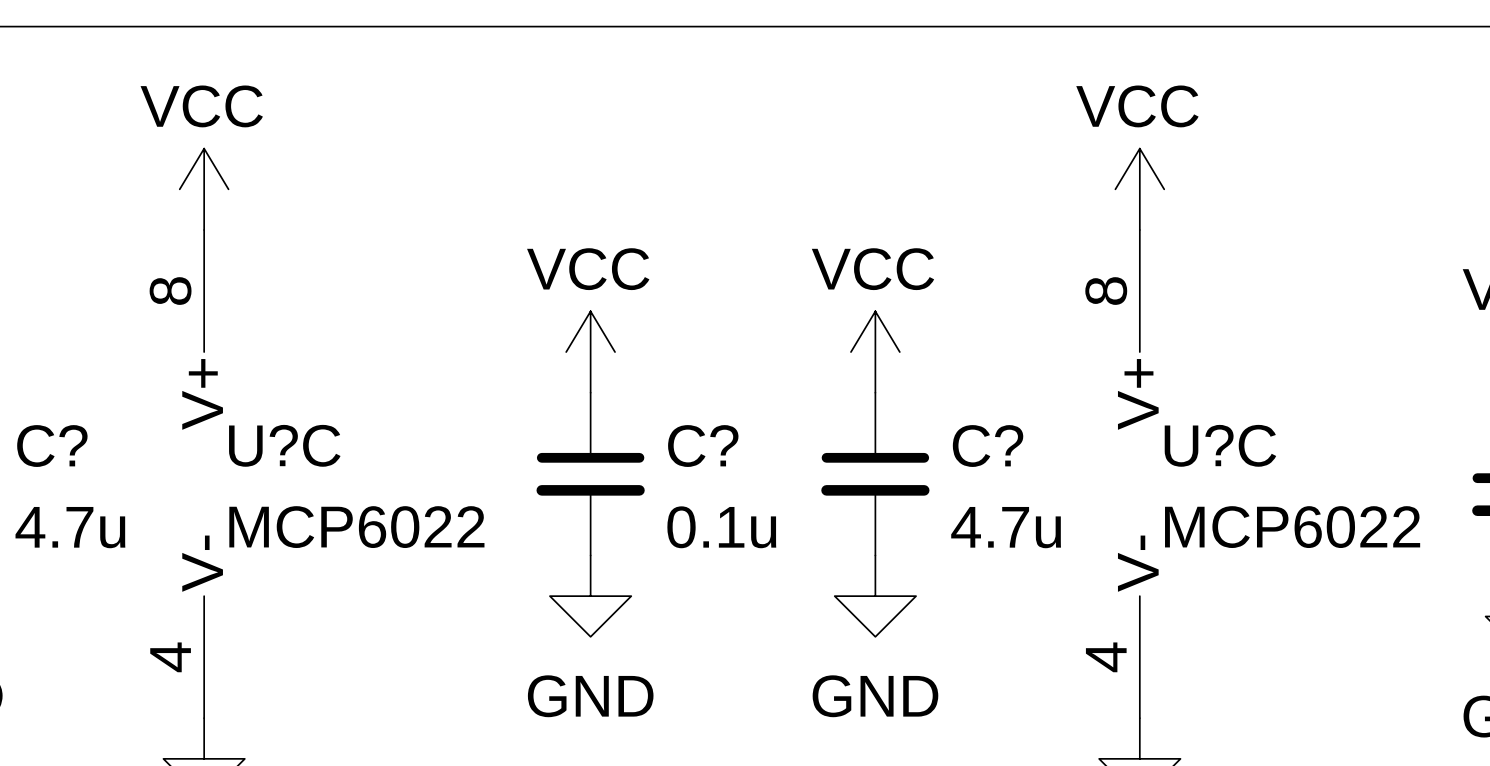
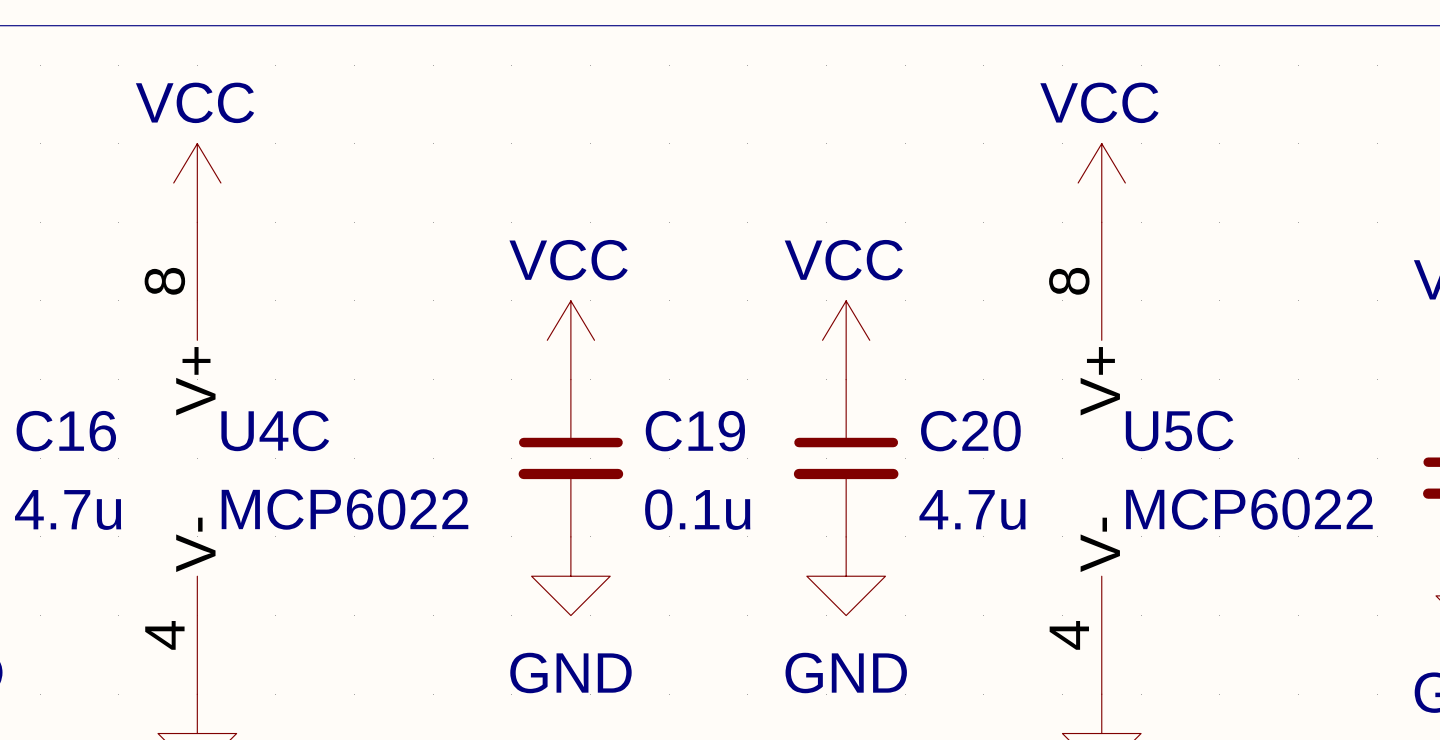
U?C name: U?C (284, 445) -> U4C (275, 430)
U?C name: U?C (1220, 445) -> U5C (1179, 430)
C? name: C? (52, 446) -> C16 (66, 431)
C? name: C? (703, 446) -> C19 (695, 431)
C? name: C? (988, 446) -> C20 (970, 431)

